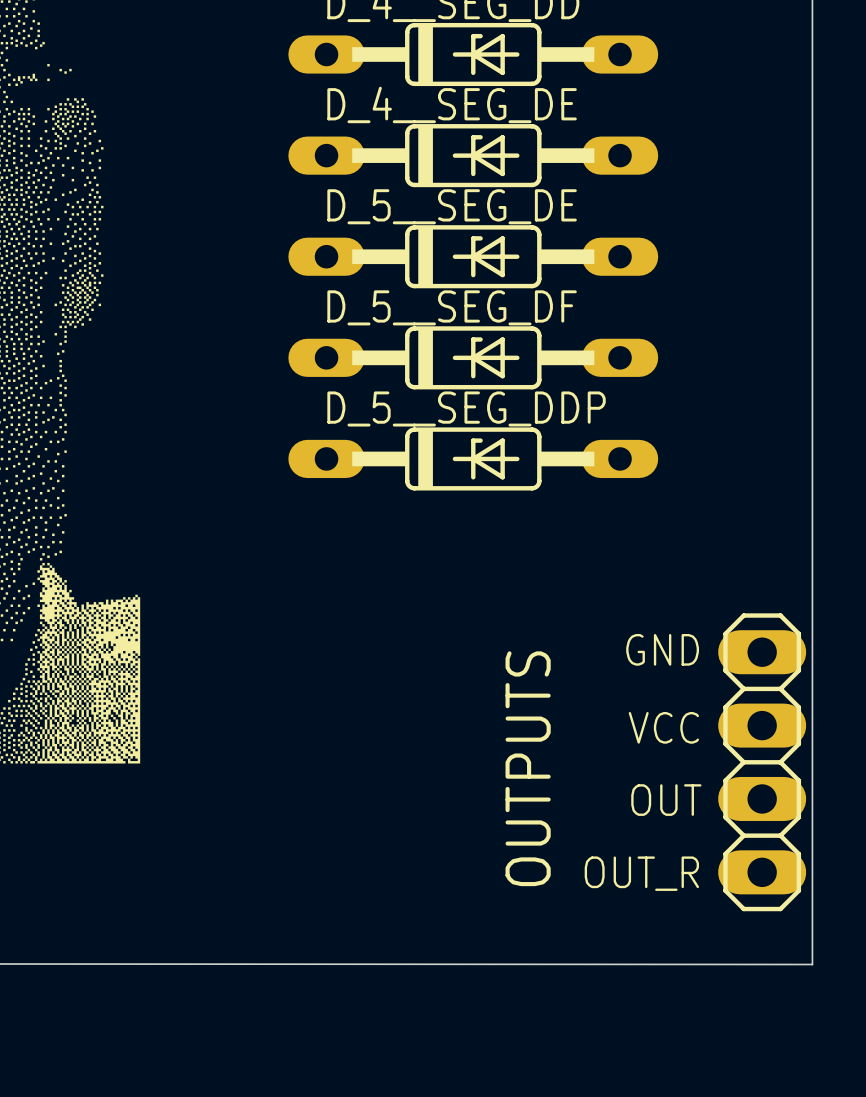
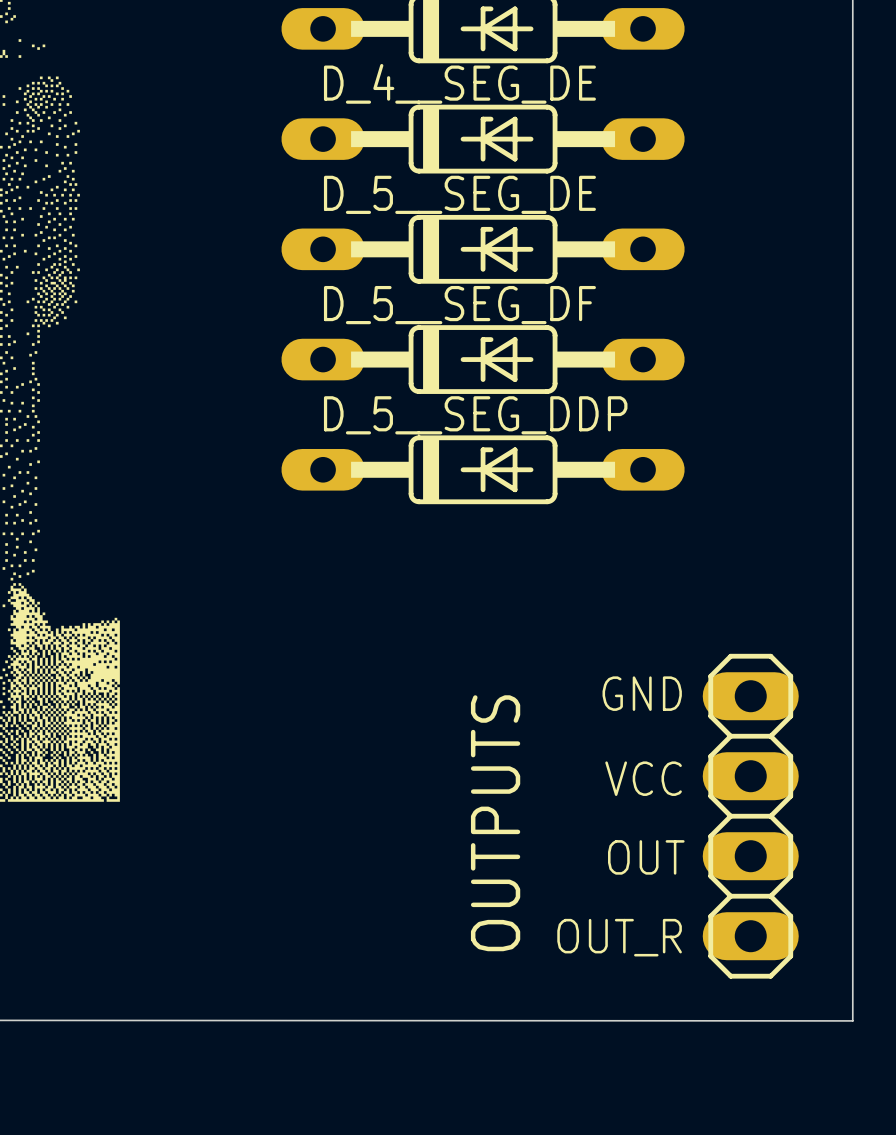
text position: GND (662, 649) -> GND (642, 693)
text position: VCC (663, 727) -> VCC (643, 778)
OUTPUTS position: (762, 762) -> (750, 816)
text position: OUT (666, 800) -> OUT (646, 857)
text position: OUT_R (641, 873) -> OUT_R (619, 937)

